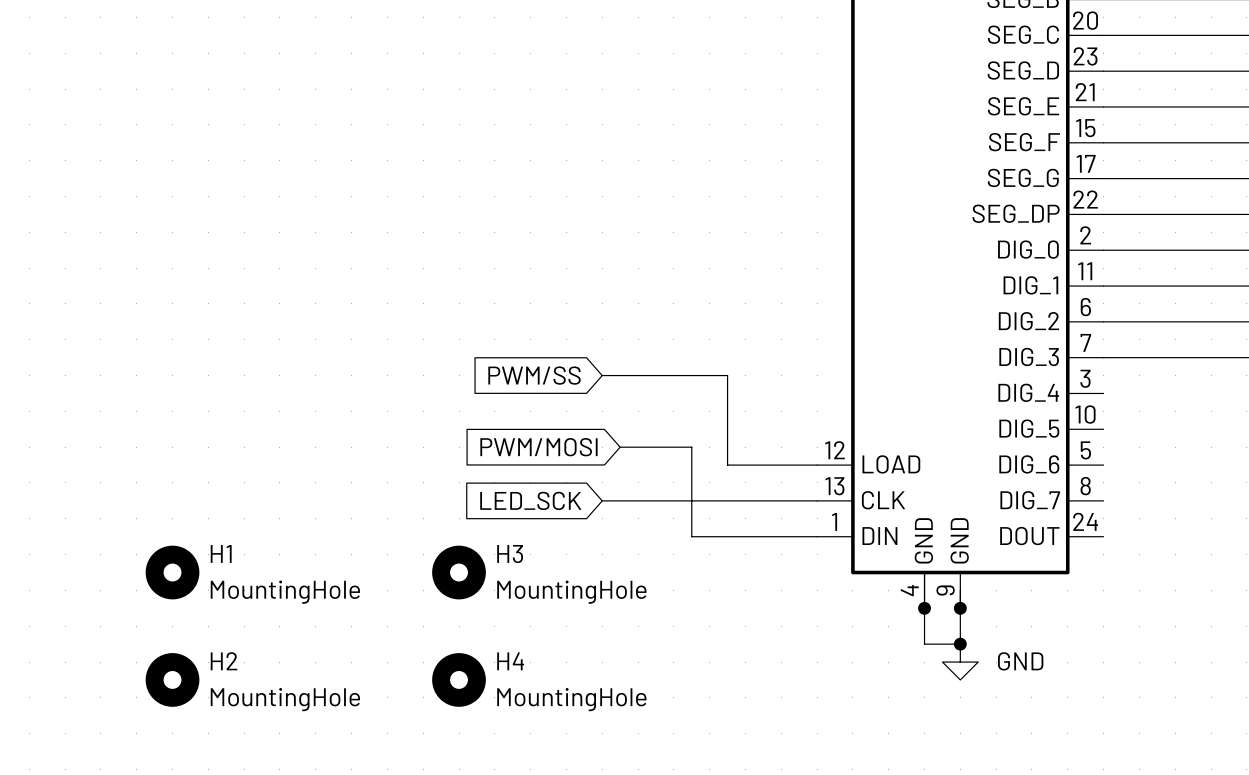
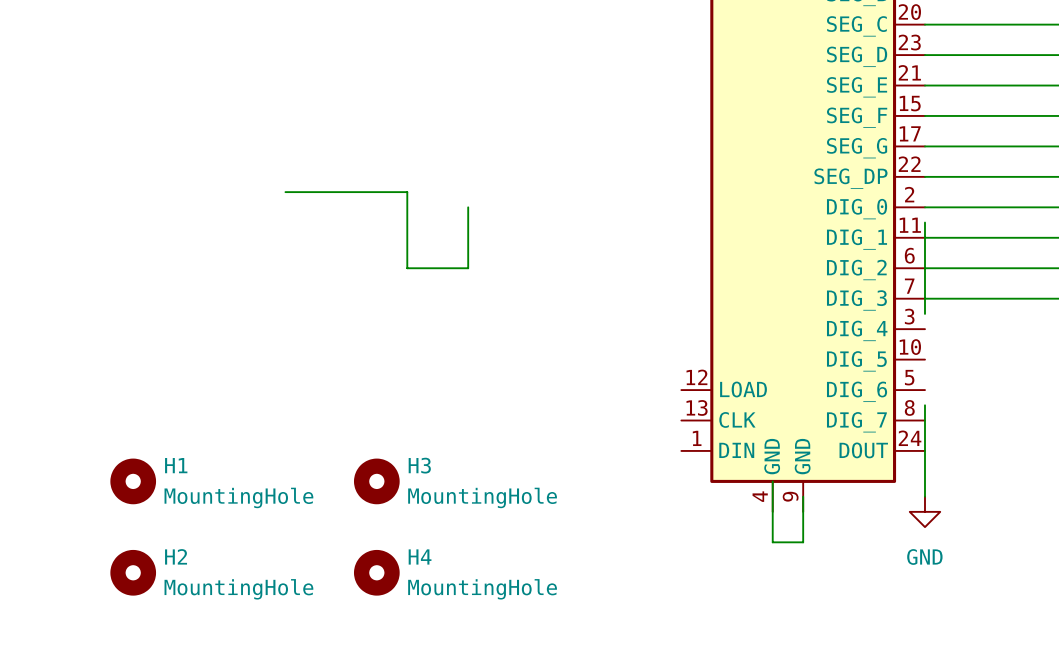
wire: none -> (285, 192) (407, 192) (407, 268) (468, 268) (468, 207)
wire: none -> (924, 222) (924, 313)
global label: PWM/SS (534, 375) -> none
wire: (602, 375) (727, 375) (727, 465) (817, 465) -> none
global label: PWM/MOSI (538, 447) -> none
wire: (620, 447) (691, 447) (691, 536) (817, 536) -> none
wire: none -> (924, 405) (924, 496)
global label: LED_SCK (530, 500) -> none
wire: (602, 500) (817, 500) -> none
junction: (924, 608) -> none
junction: (960, 608) -> none
junction: (960, 644) -> none
power symbol text position: GND (1020, 661) -> GND (924, 556)
power symbol position: GND (960, 662) -> GND (924, 511)

